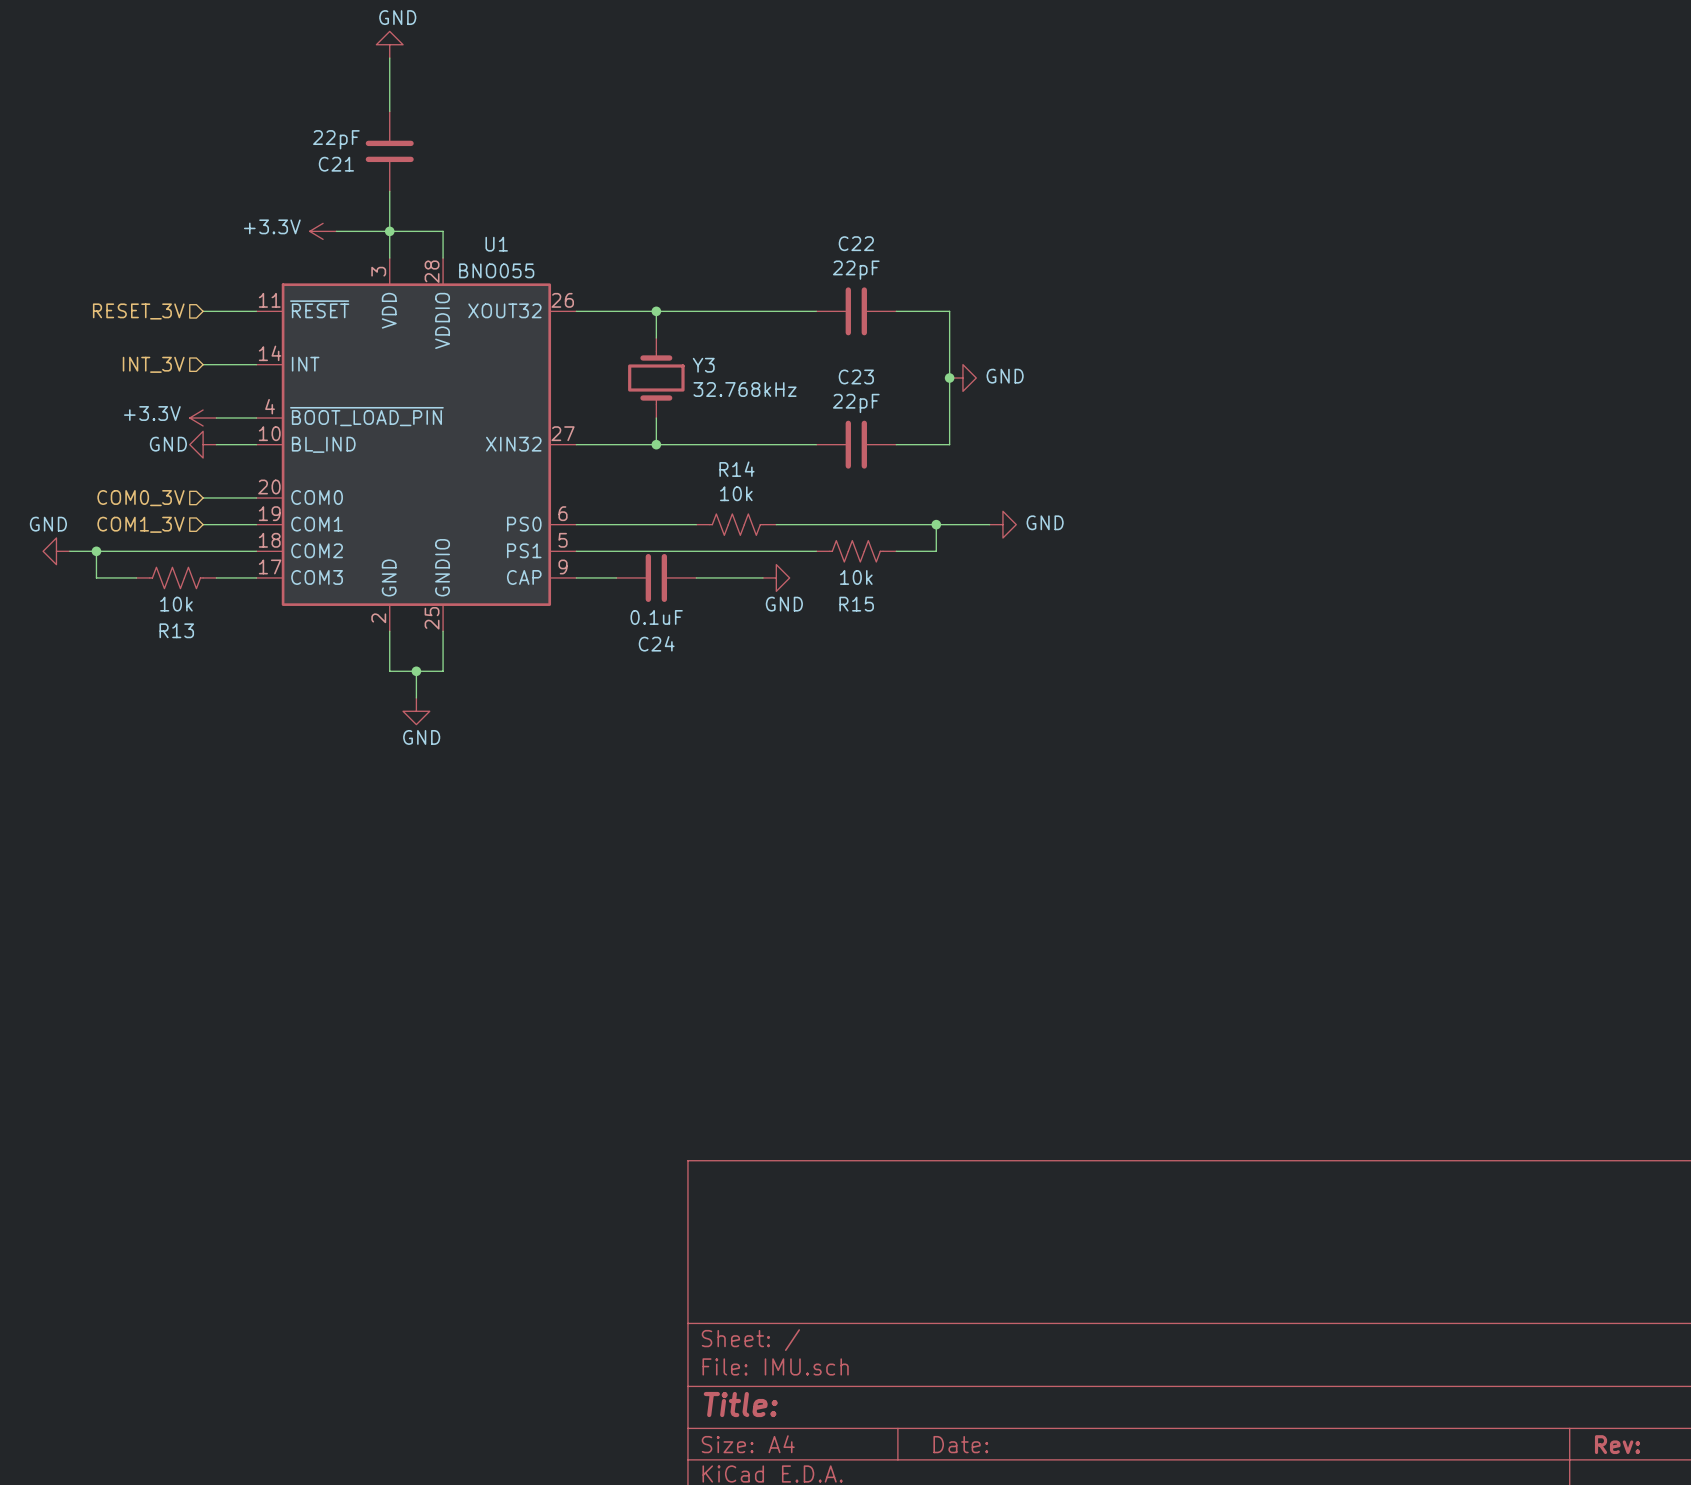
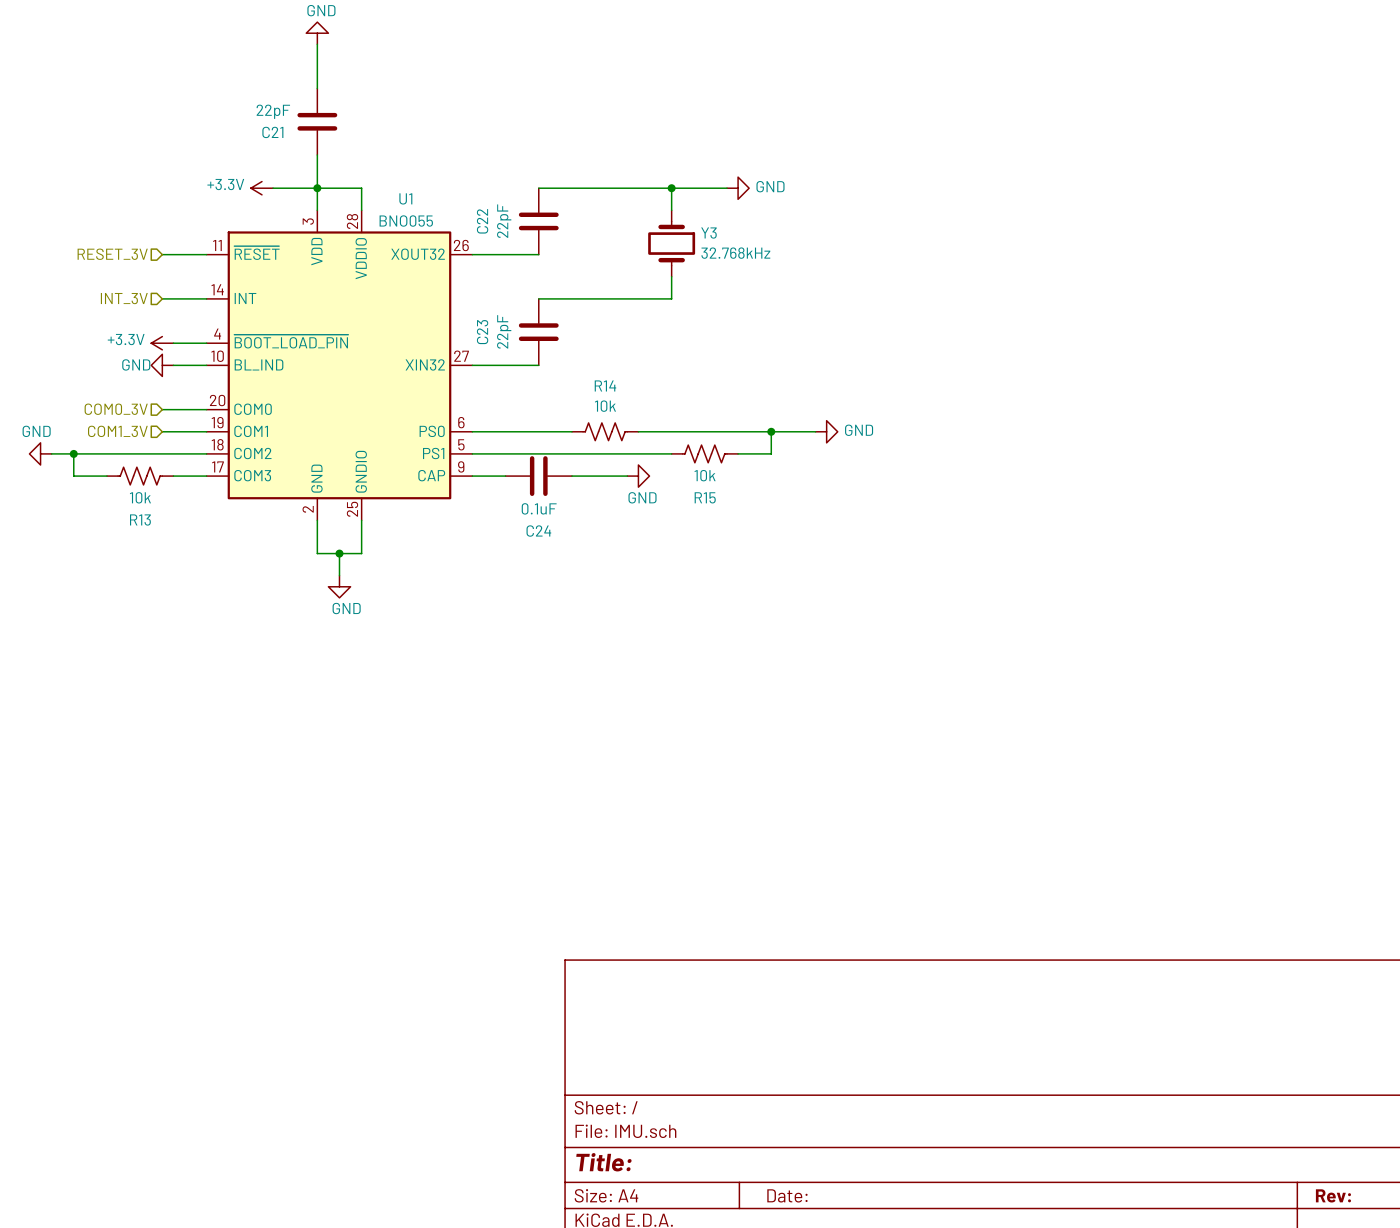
wire: none -> (538, 188) (726, 188)
wire: none -> (671, 188) (671, 210)
junction: none -> (671, 188)
C22 name position: C22 (856, 243) -> C22 (482, 221)
C22 value position: 22pF (856, 270) -> 22pF (504, 221)
junction: (656, 311) -> none
wire: (816, 311) (656, 311) (656, 338) -> none
C22 rotation: 0° (856, 311) -> 90° clockwise (538, 221)
C22 position: (856, 311) -> (538, 221)
wire: (896, 311) (949, 311) (949, 444) (896, 444) -> none
wire: none -> (671, 276) (671, 298) (538, 298)
C23 name position: C23 (856, 376) -> C23 (482, 332)
Y3 position: (656, 378) -> (671, 243)
junction: (949, 378) -> none
power symbol position: GND (962, 378) -> GND (738, 188)
C23 value position: 22pF (856, 403) -> 22pF (504, 331)
wire: (656, 418) (656, 444) (816, 444) -> none
junction: (656, 444) -> none
C23 rotation: 0° (856, 444) -> 90° clockwise (538, 332)
C23 position: (856, 444) -> (538, 332)

